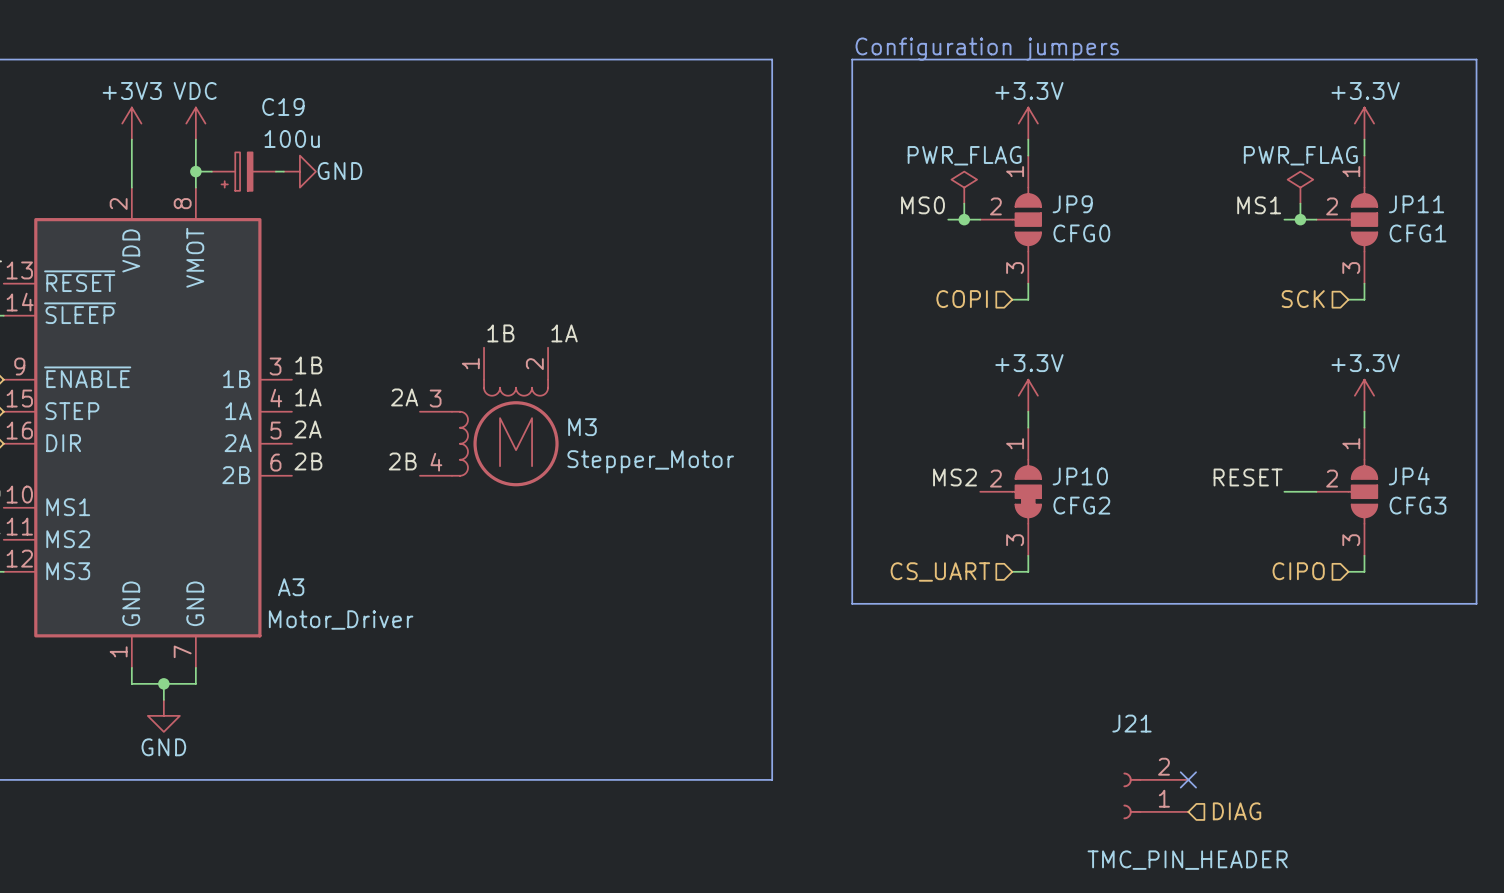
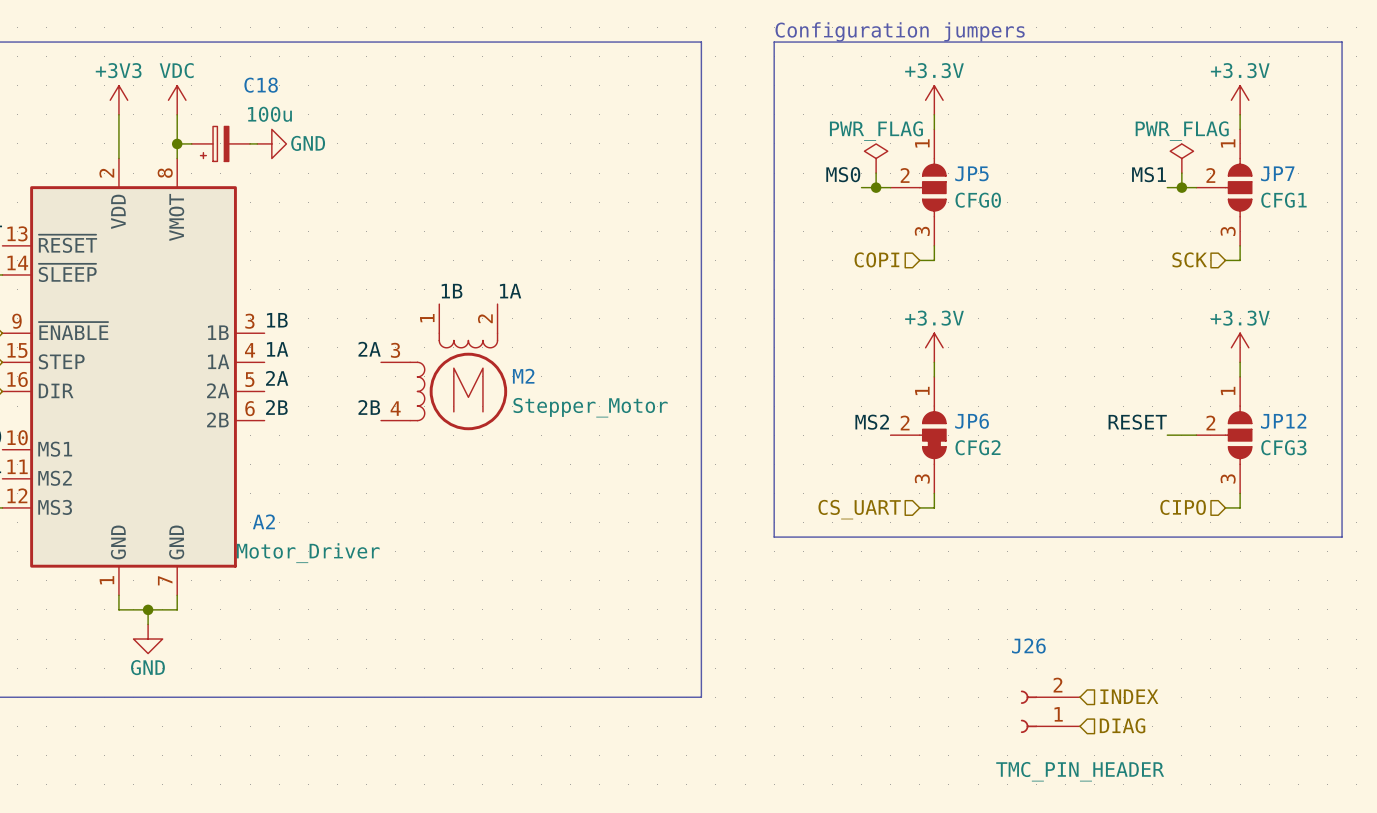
C19 name: C19 (283, 106) -> C18 (261, 85)
JP9 name: JP9 (1072, 204) -> JP5 (971, 173)
JP11 name: JP11 (1416, 204) -> JP7 (1277, 173)
M3 name: M3 (582, 427) -> M2 (523, 376)
JP10 name: JP10 (1080, 476) -> JP6 (972, 421)
JP4 name: JP4 (1409, 476) -> JP12 (1283, 421)
A3 name: A3 (291, 587) -> A2 (263, 521)
J21 name: J21 (1131, 723) -> J26 (1028, 645)
no-connect mark: (1188, 779) -> none
hierarchical label: none -> INDEX (1129, 696)

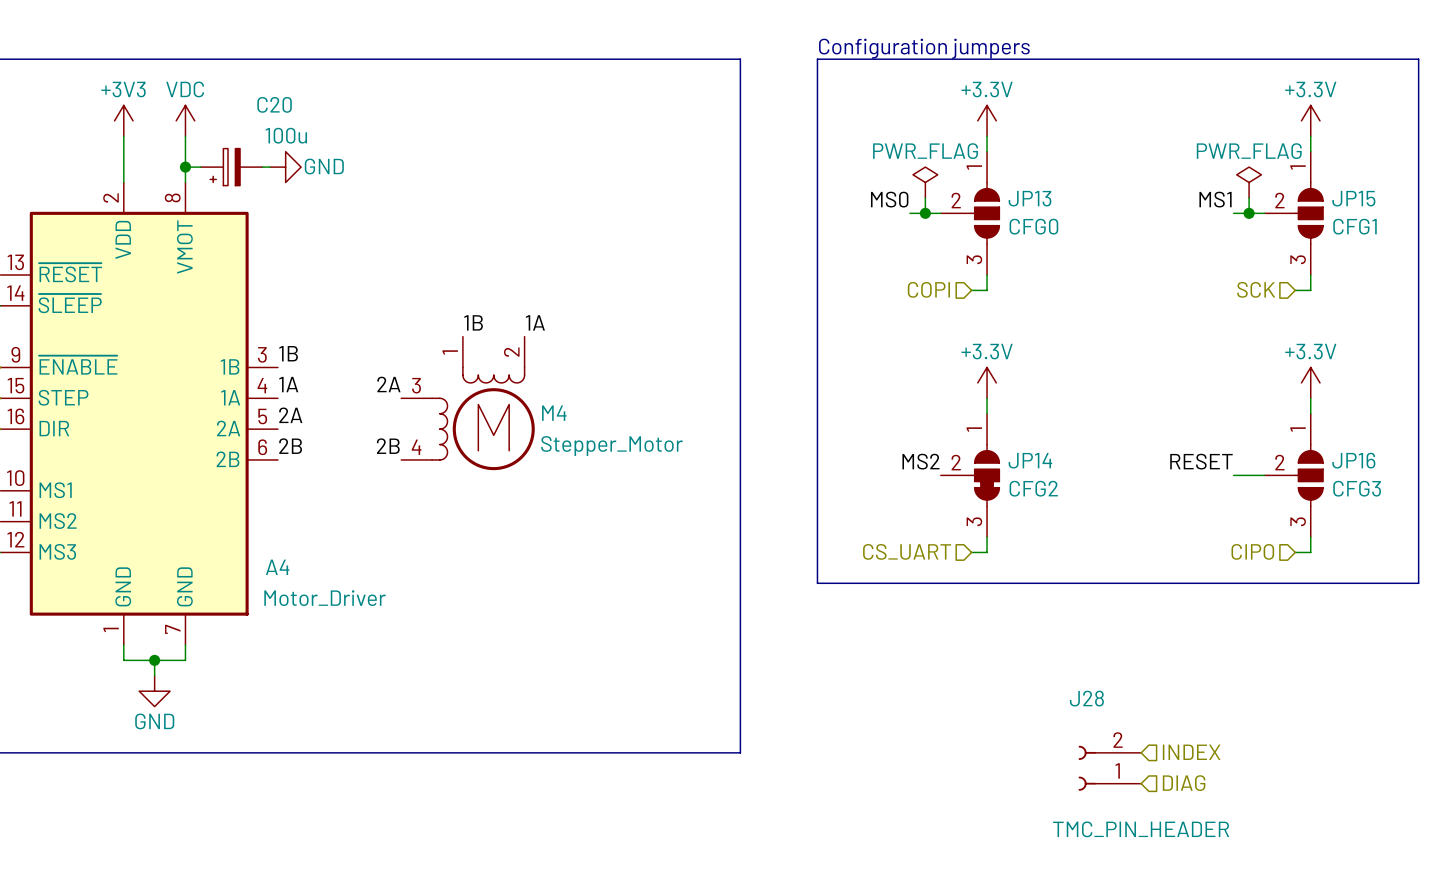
C18 name: C18 (261, 85) -> C20 (274, 104)
JP5 name: JP5 (971, 173) -> JP13 (1029, 198)
JP7 name: JP7 (1277, 173) -> JP15 (1353, 198)
M2 name: M2 (523, 376) -> M4 (554, 413)
JP6 name: JP6 (972, 421) -> JP14 (1030, 460)
JP12 name: JP12 (1283, 421) -> JP16 (1353, 460)
A2 name: A2 (263, 521) -> A4 (277, 567)
J26 name: J26 (1028, 645) -> J28 (1086, 698)

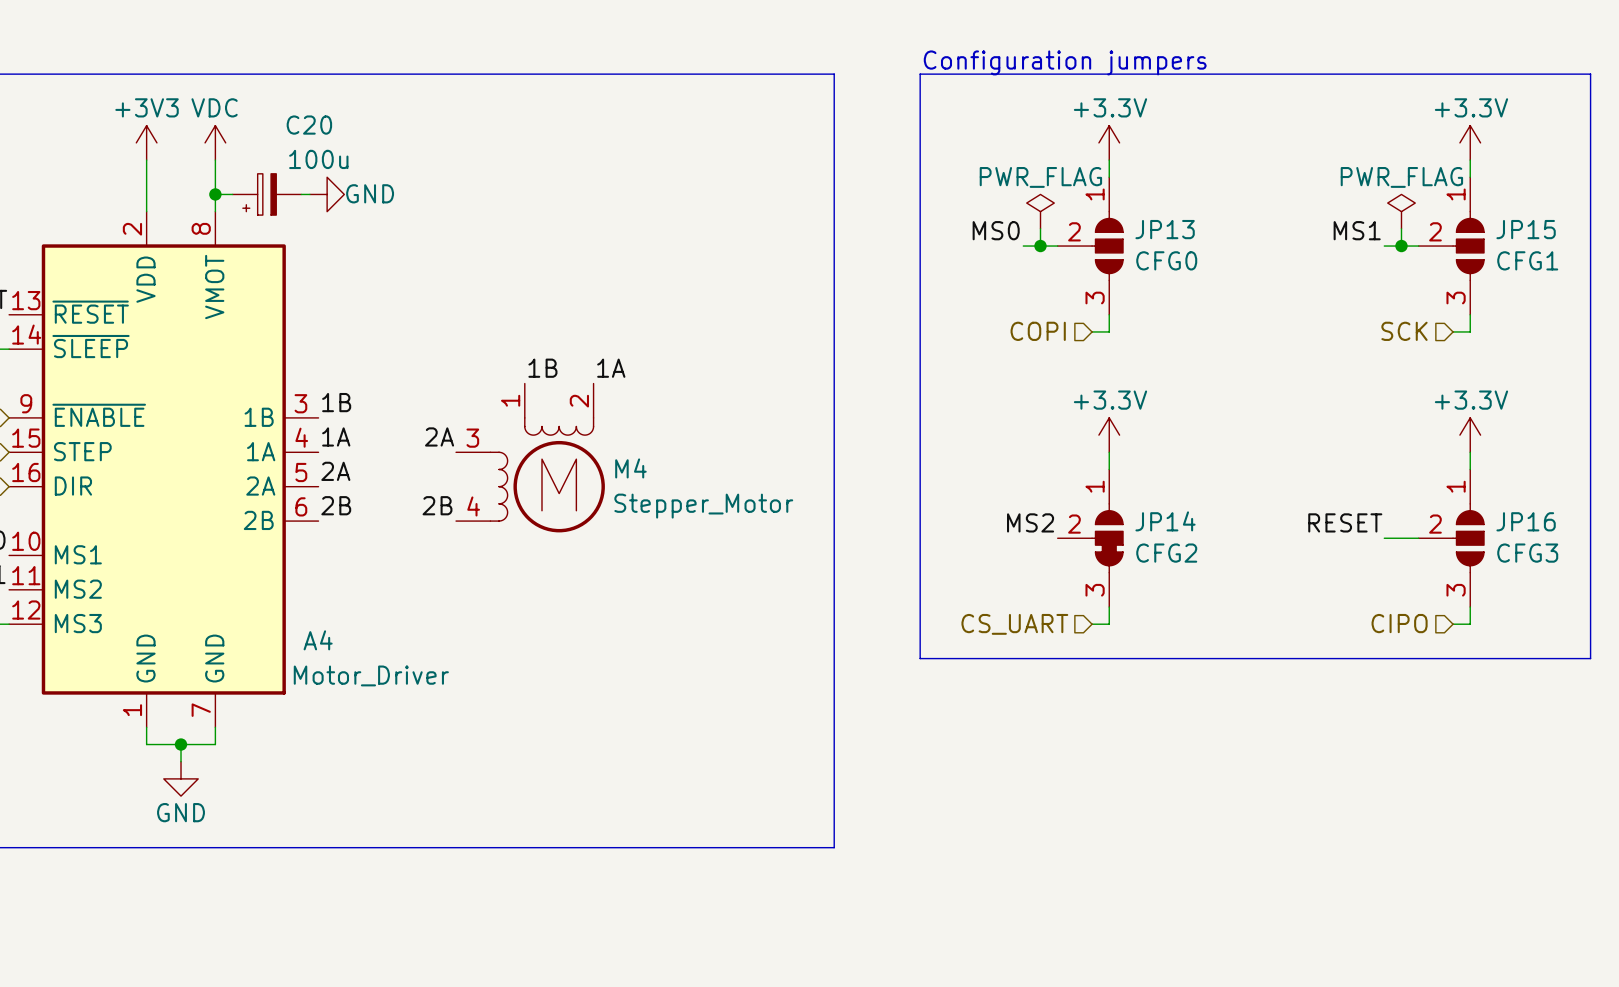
hierarchical label: INDEX (1191, 752) -> none
J28: TMC_PIN_HEADER (1109, 768) -> none
hierarchical label: DIAG (1184, 783) -> none

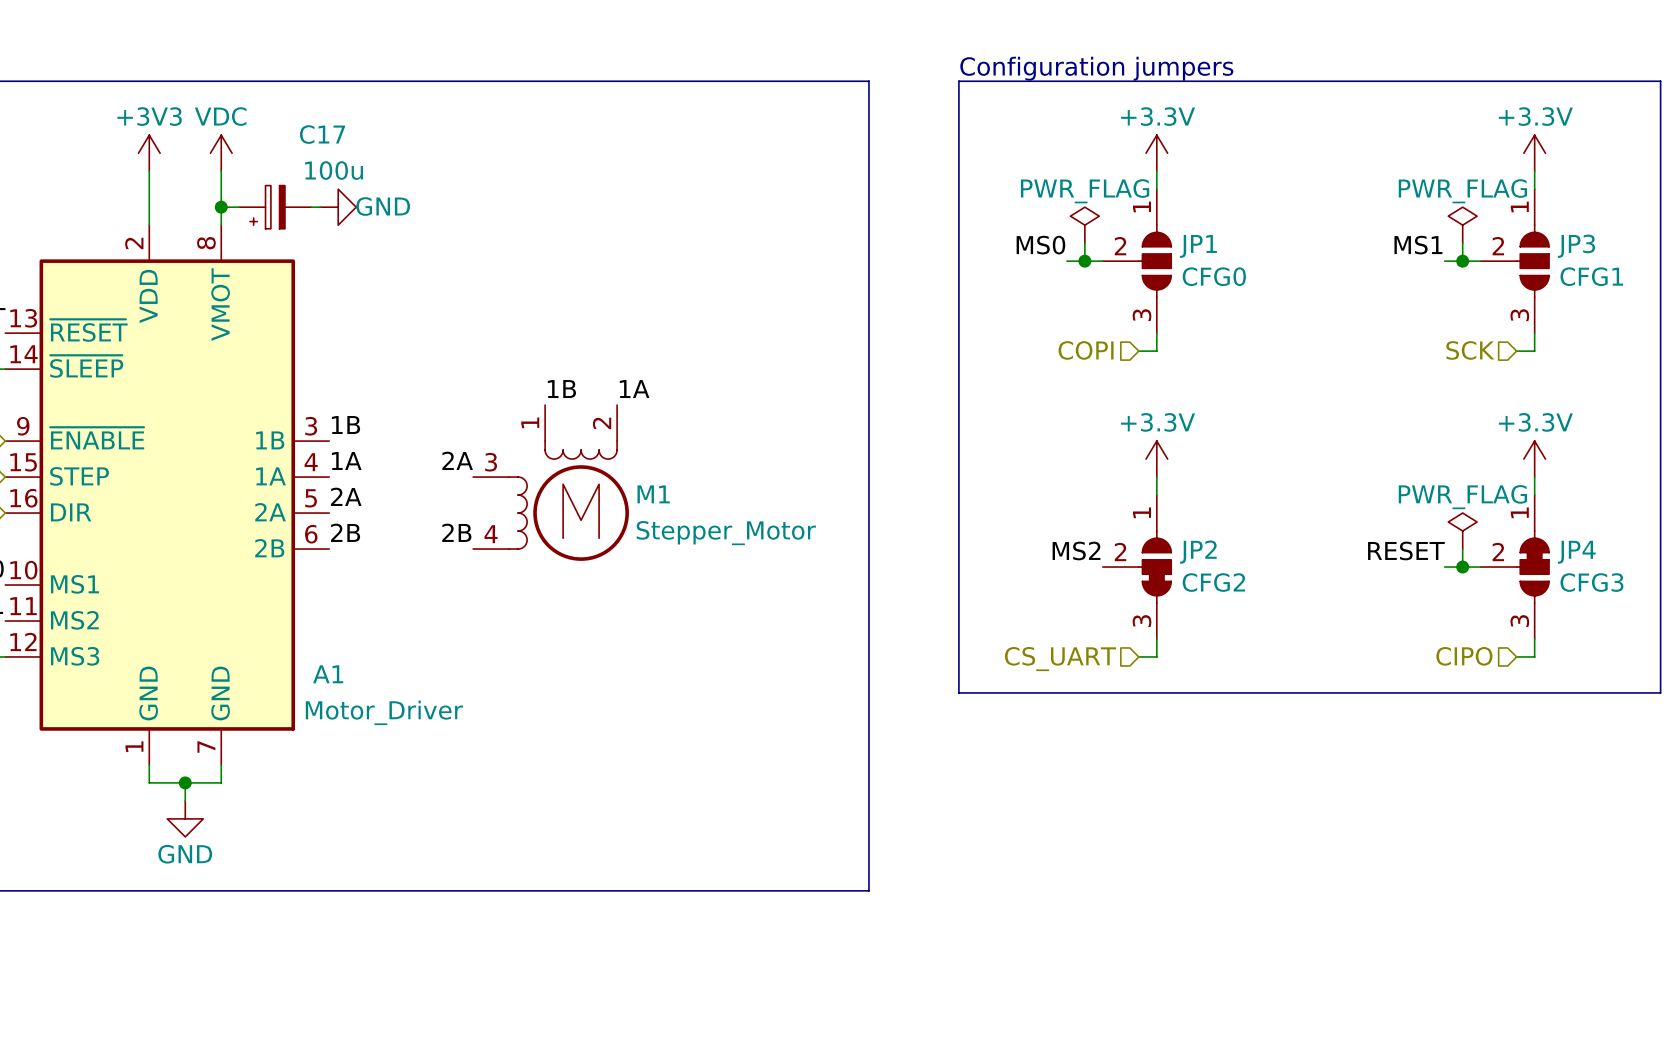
C20 name: C20 (309, 125) -> C17 (322, 134)
JP13 name: JP13 (1165, 229) -> JP1 (1198, 246)
JP15 name: JP15 (1526, 229) -> JP3 (1576, 246)
M4 name: M4 (630, 468) -> M1 (653, 494)
power symbol: none -> PWR_FLAG (1462, 531)
JP14 name: JP14 (1165, 521) -> JP2 (1198, 552)
wire: none -> (1462, 549) (1462, 567)
junction: none -> (1462, 567)
JP16: CFG3 (1451, 538) -> none
JP4: none -> CFG3 (1514, 567)
A4 name: A4 (318, 640) -> A1 (328, 674)

